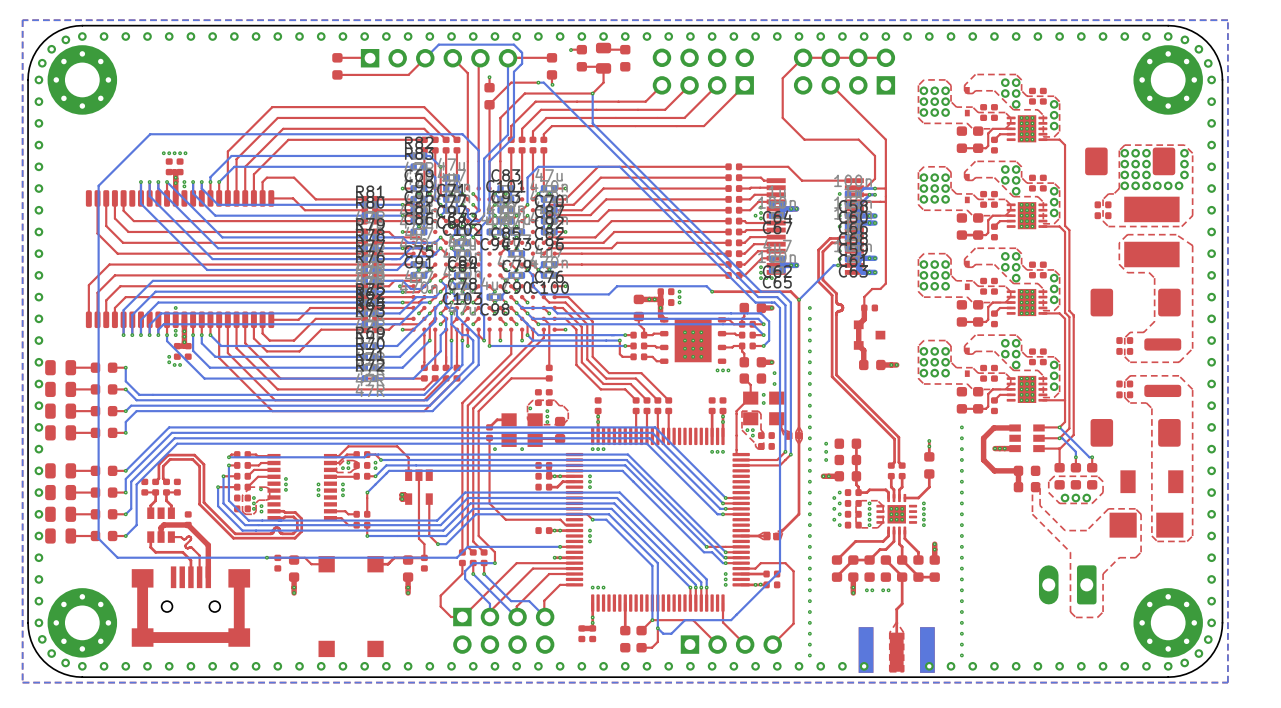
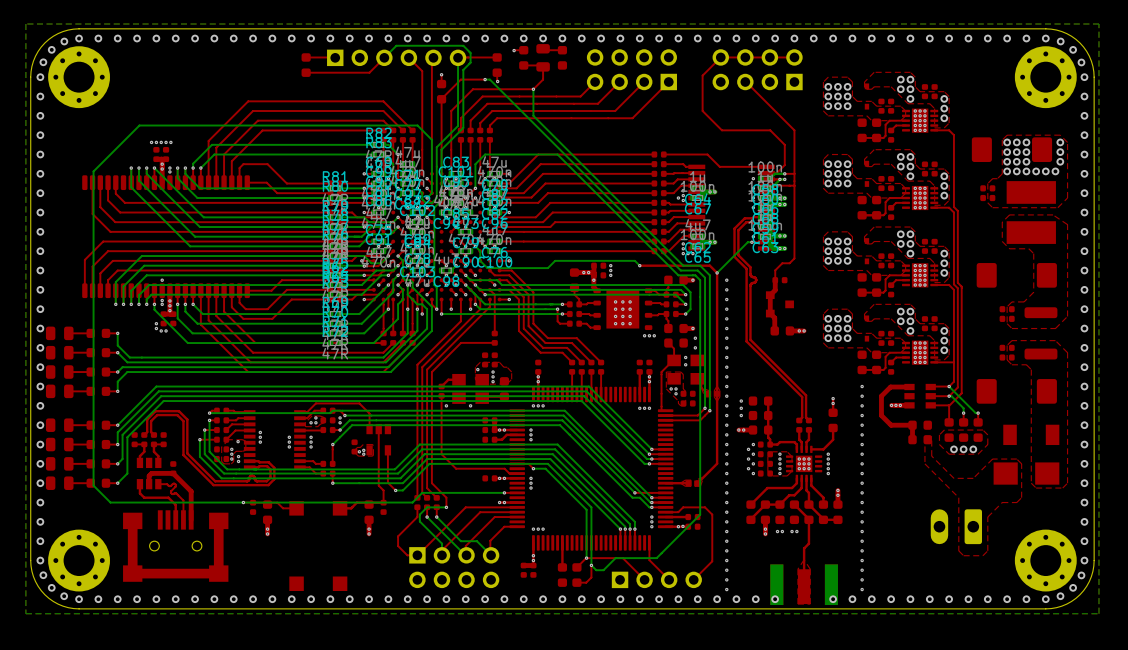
top zone outline: none -> (372, 444) (372, 456) (358, 456) (355, 453) (357, 447) (363, 444) (372, 444)
via: (402, 494) -> none
top track: (404, 494) (402, 494) (402, 499) (408, 499) (404, 494) -> none
part: none -> (354, 446)
via: none -> (359, 451)
via: none -> (363, 454)

